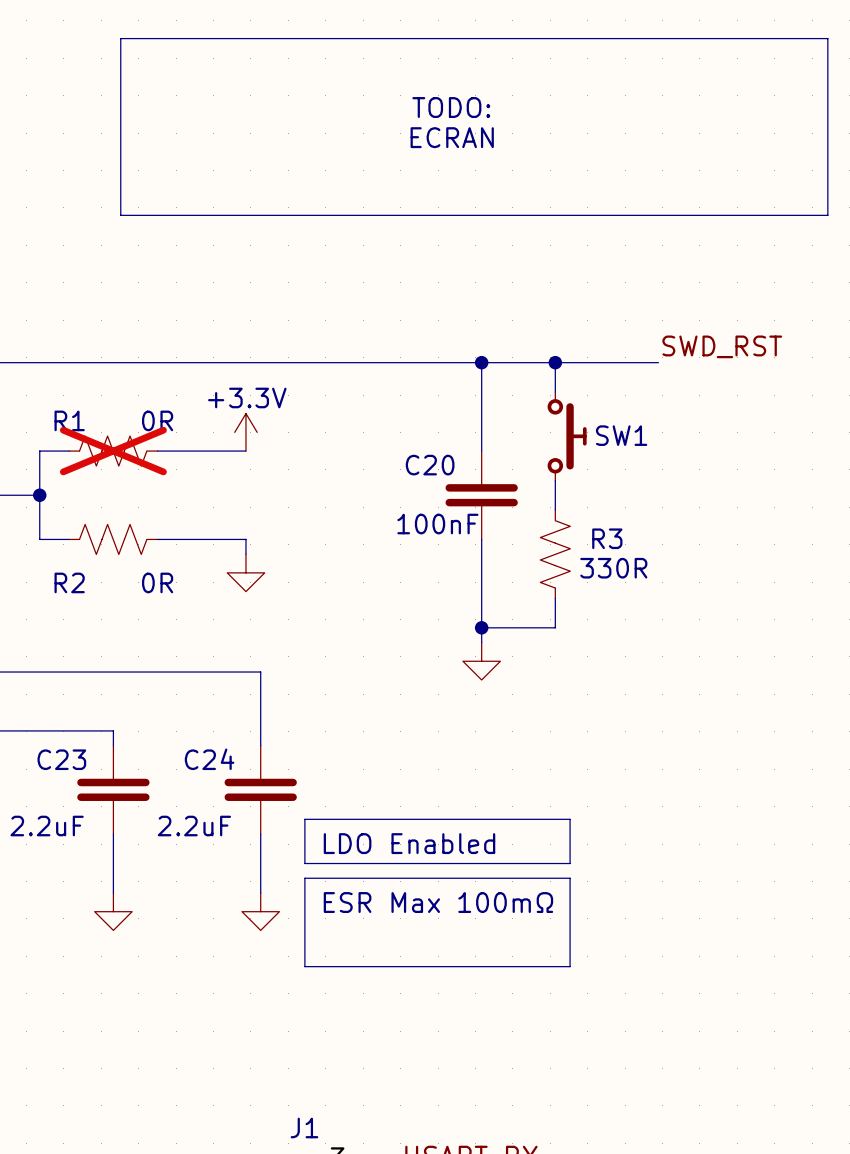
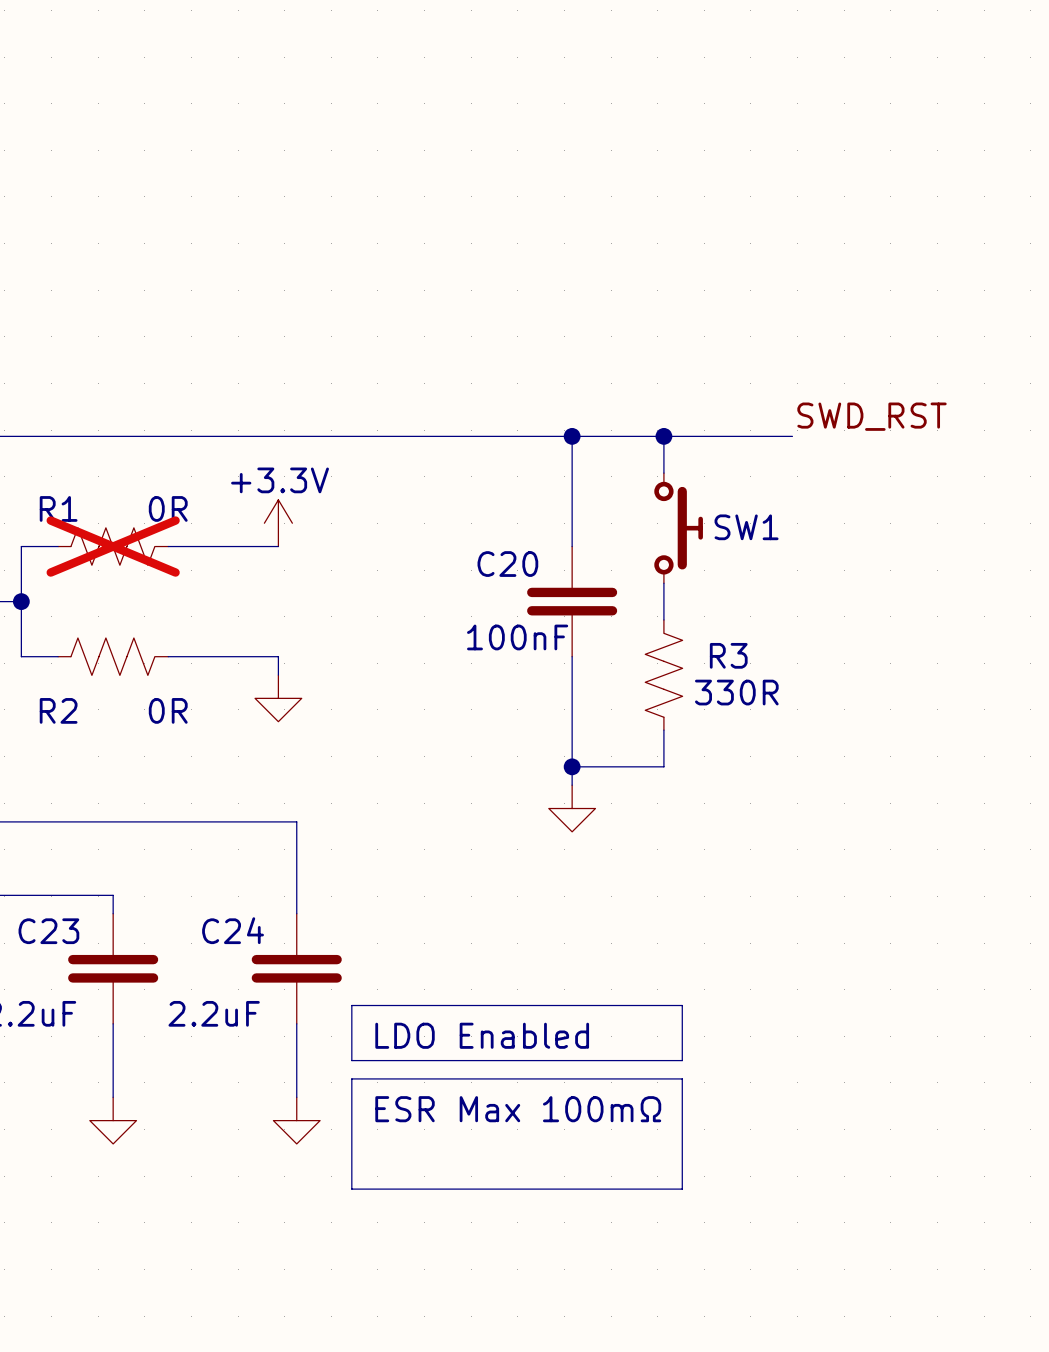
line: (120, 38) (827, 38) (827, 215) (120, 215) (120, 38) -> none
text: TODO: (451, 107) -> none
text: ECRAN (452, 137) -> none

